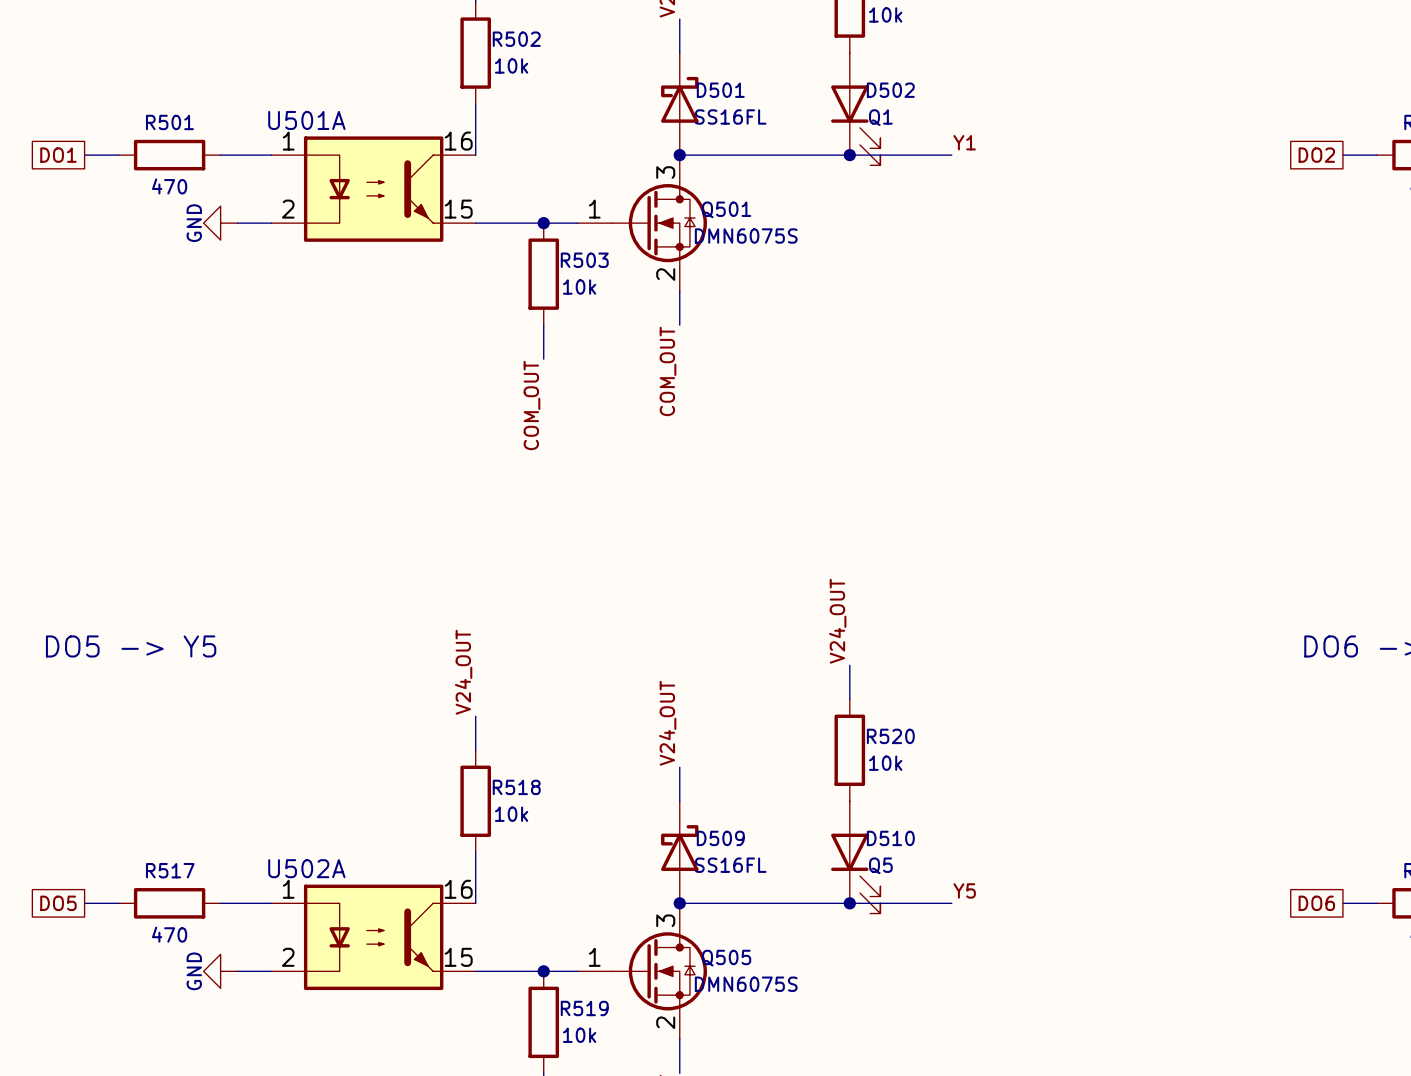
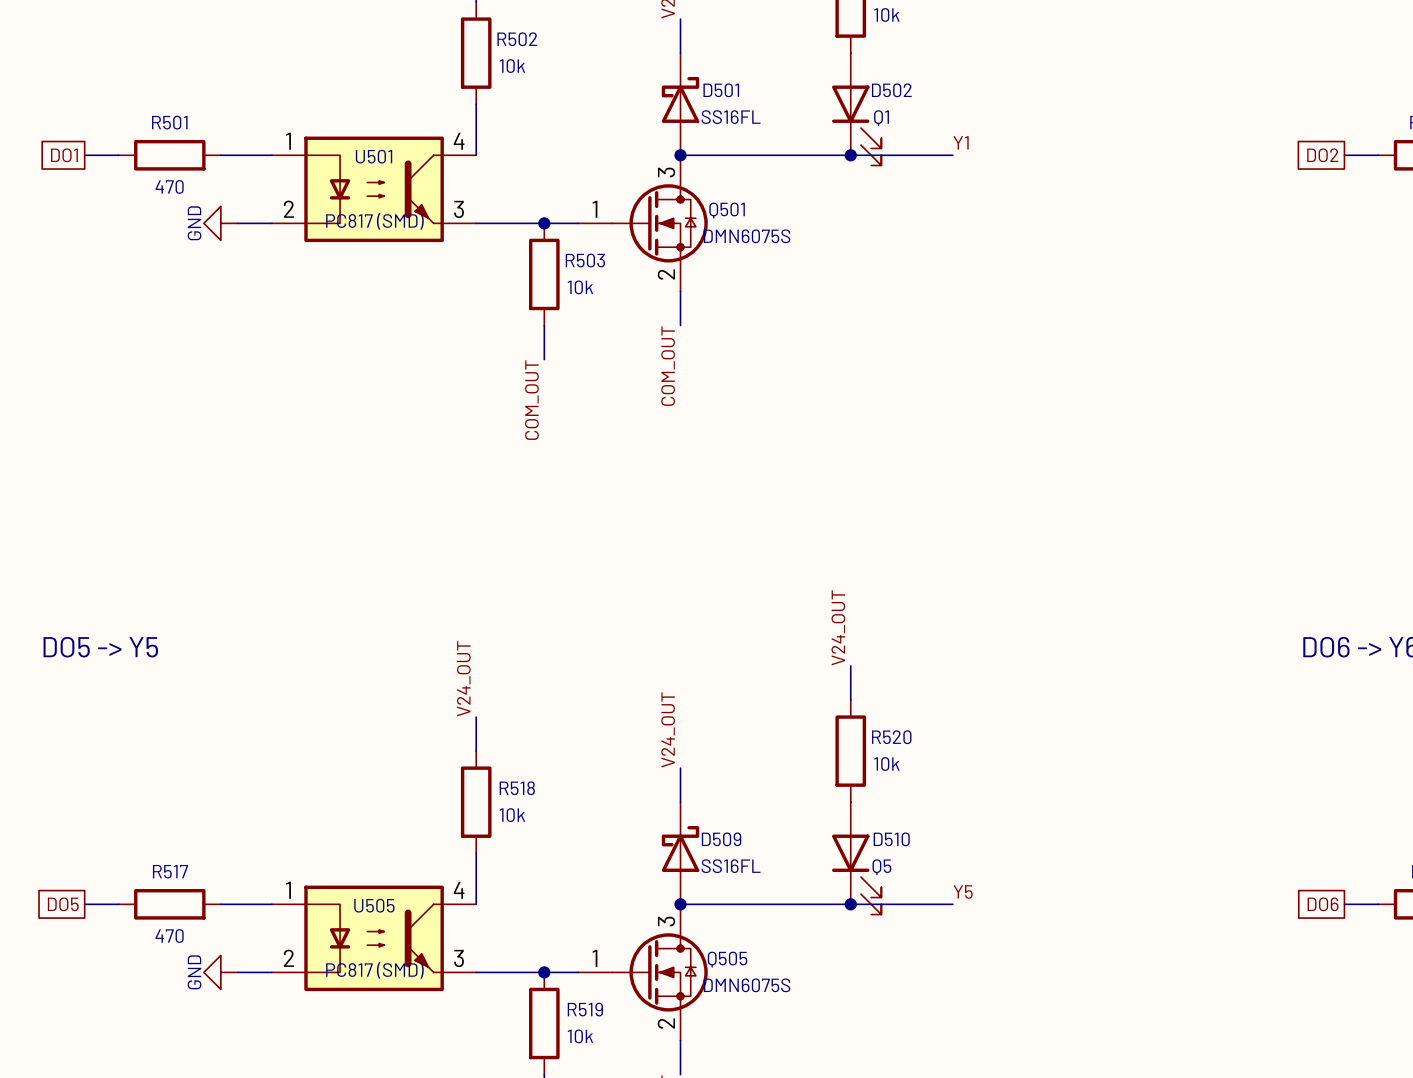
U501A: (373, 189) -> none
U501: none -> PC817 (SMD) (374, 189)
U502A: (373, 937) -> none
U505: none -> PC817 (SMD) (374, 938)

